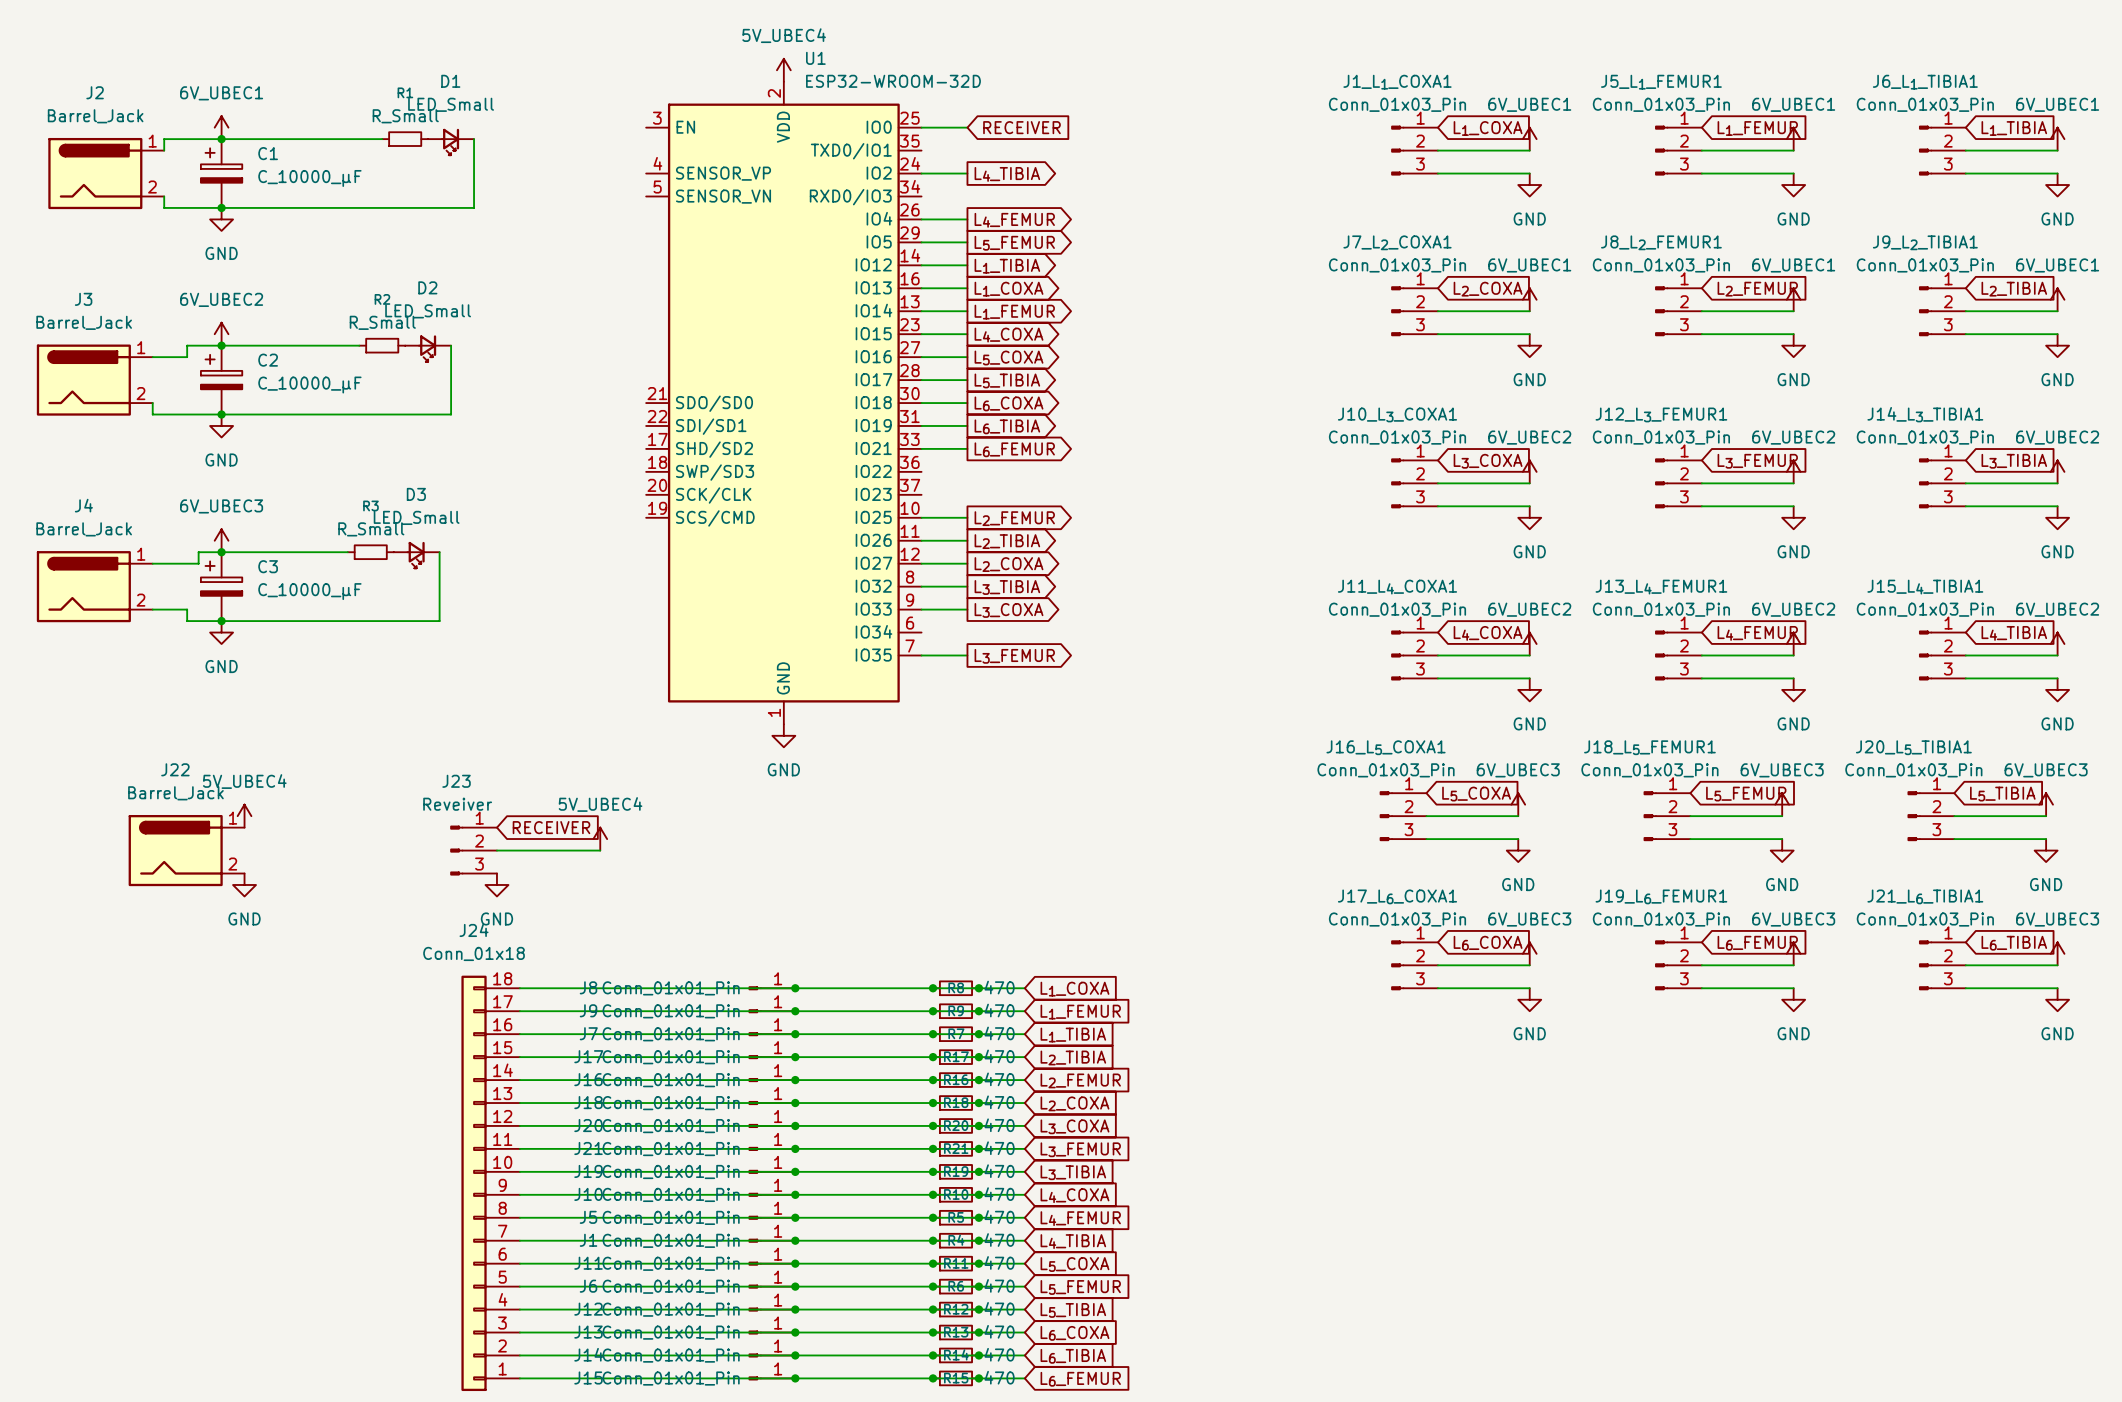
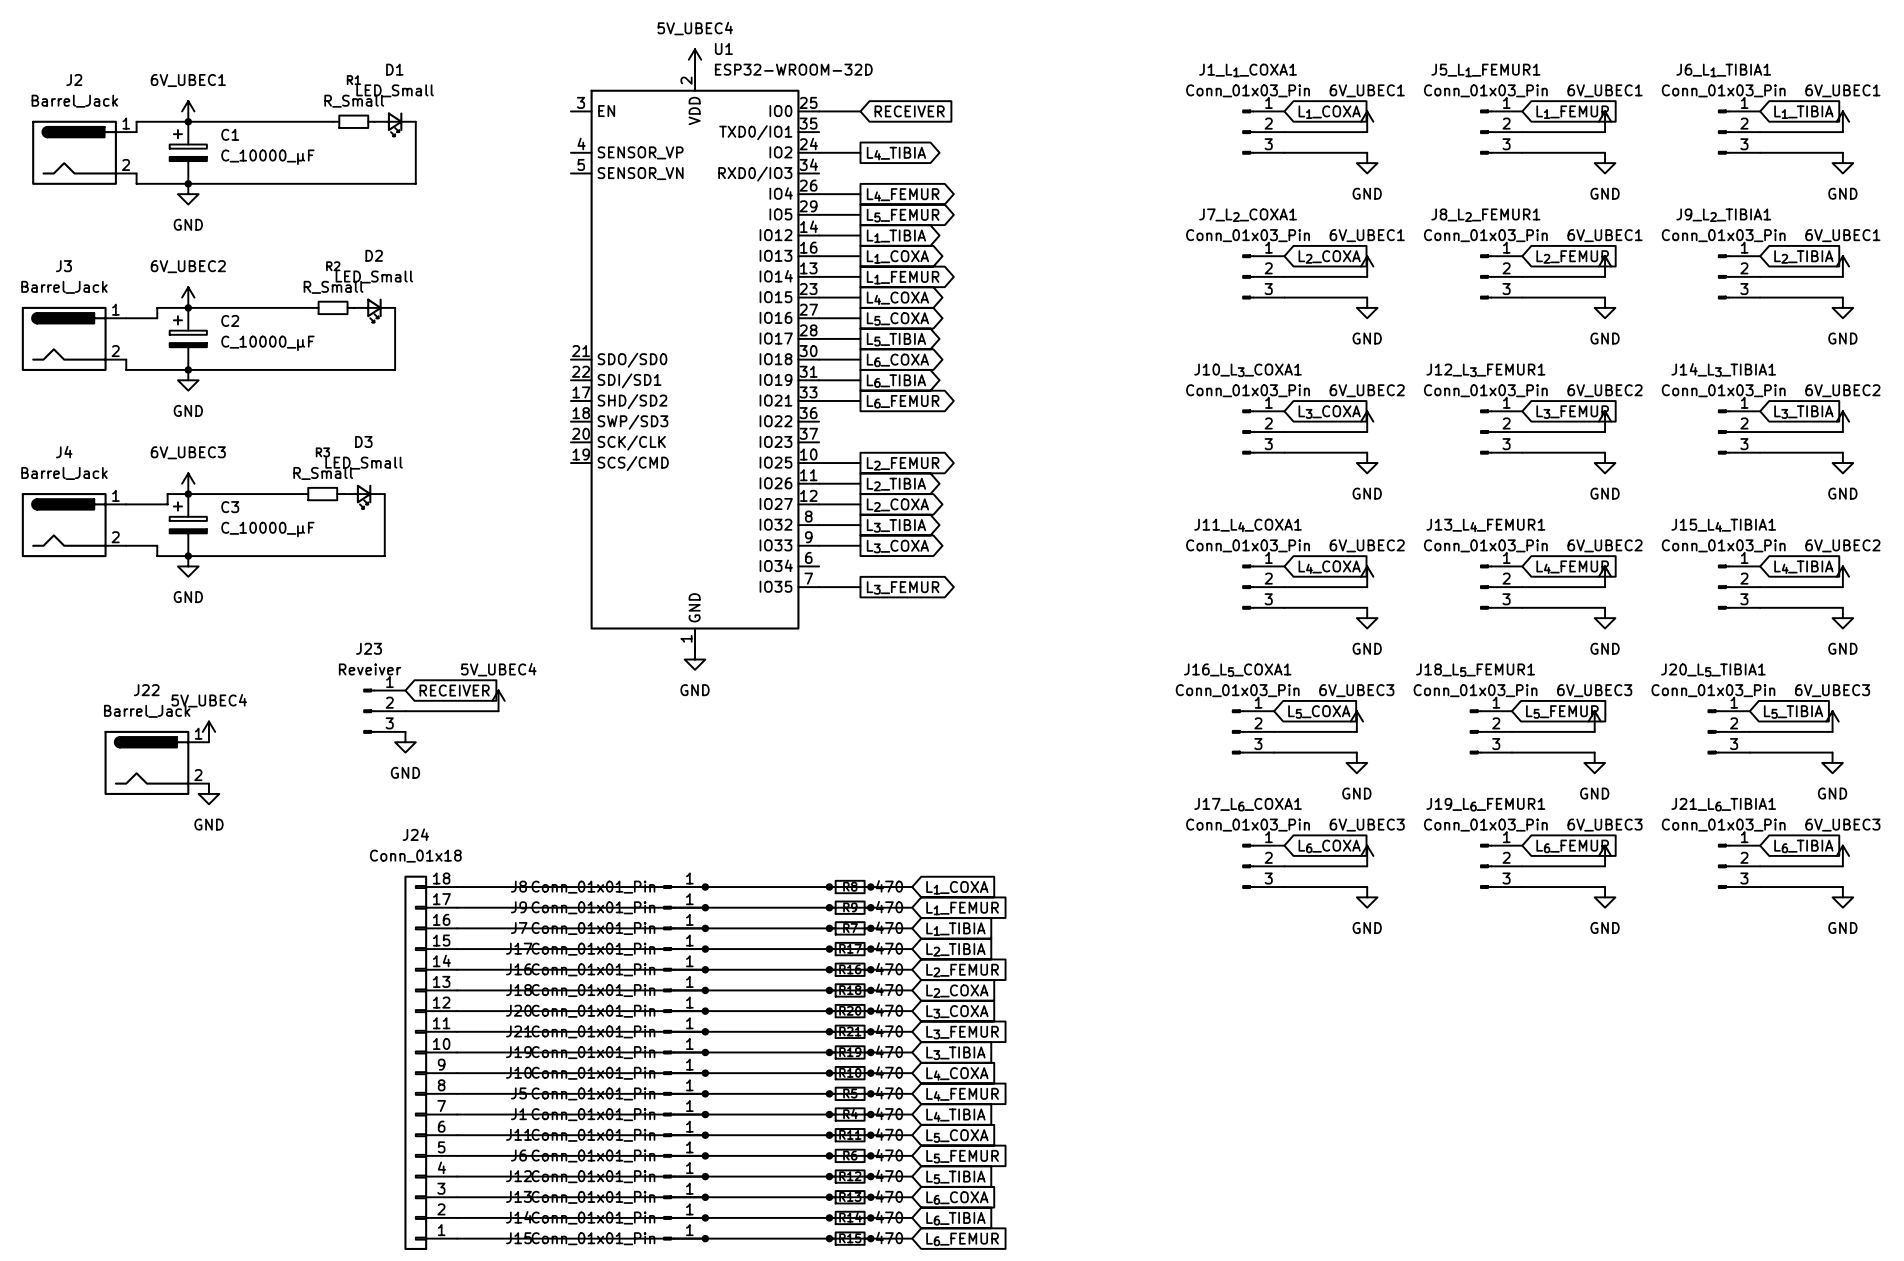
global label position: RECEIVER (551, 827) -> RECEIVER (454, 690)
power symbol position: 5V_UBEC4 (600, 839) -> 5V_UBEC4 (498, 700)
J23 position: (473, 850) -> (384, 711)
wire: (496, 850) (600, 850) -> (405, 711) (498, 711)
power symbol position: GND (496, 884) -> GND (405, 742)

